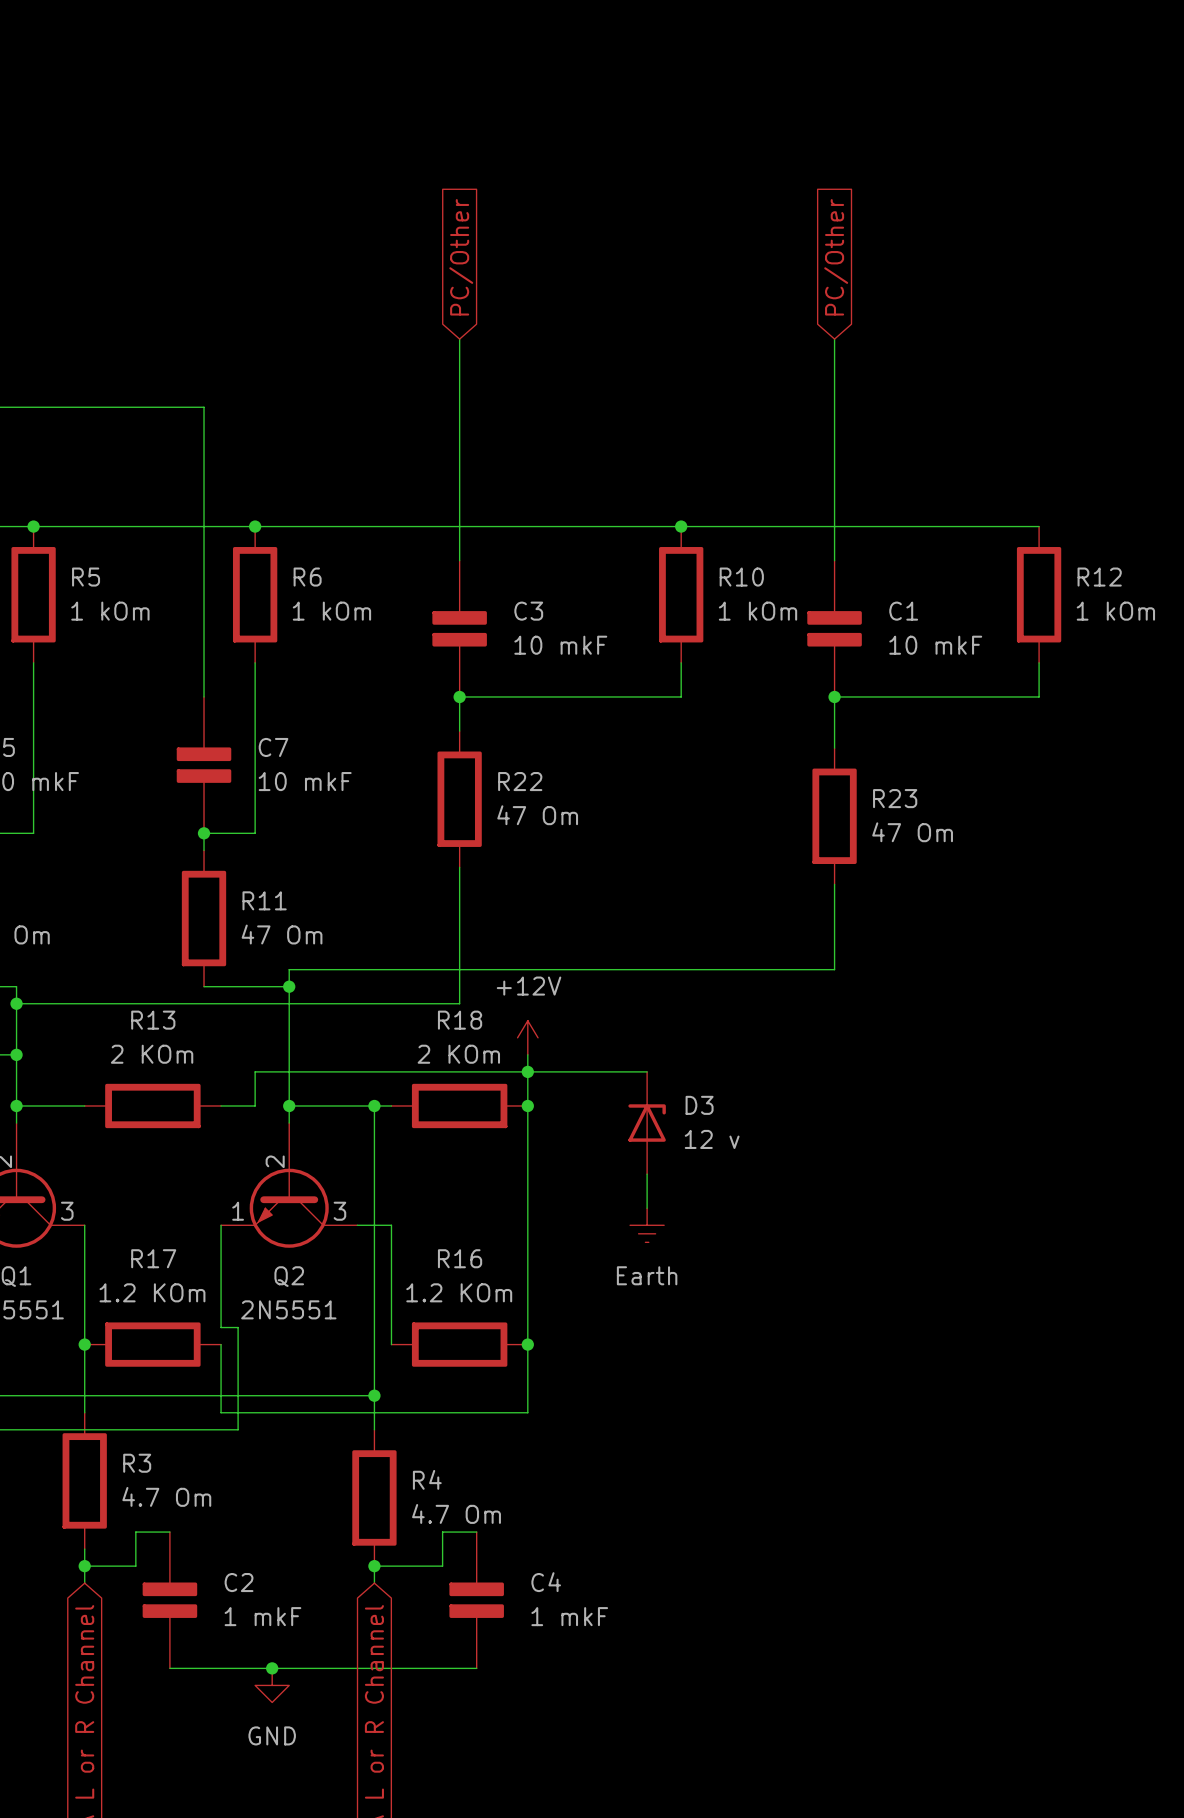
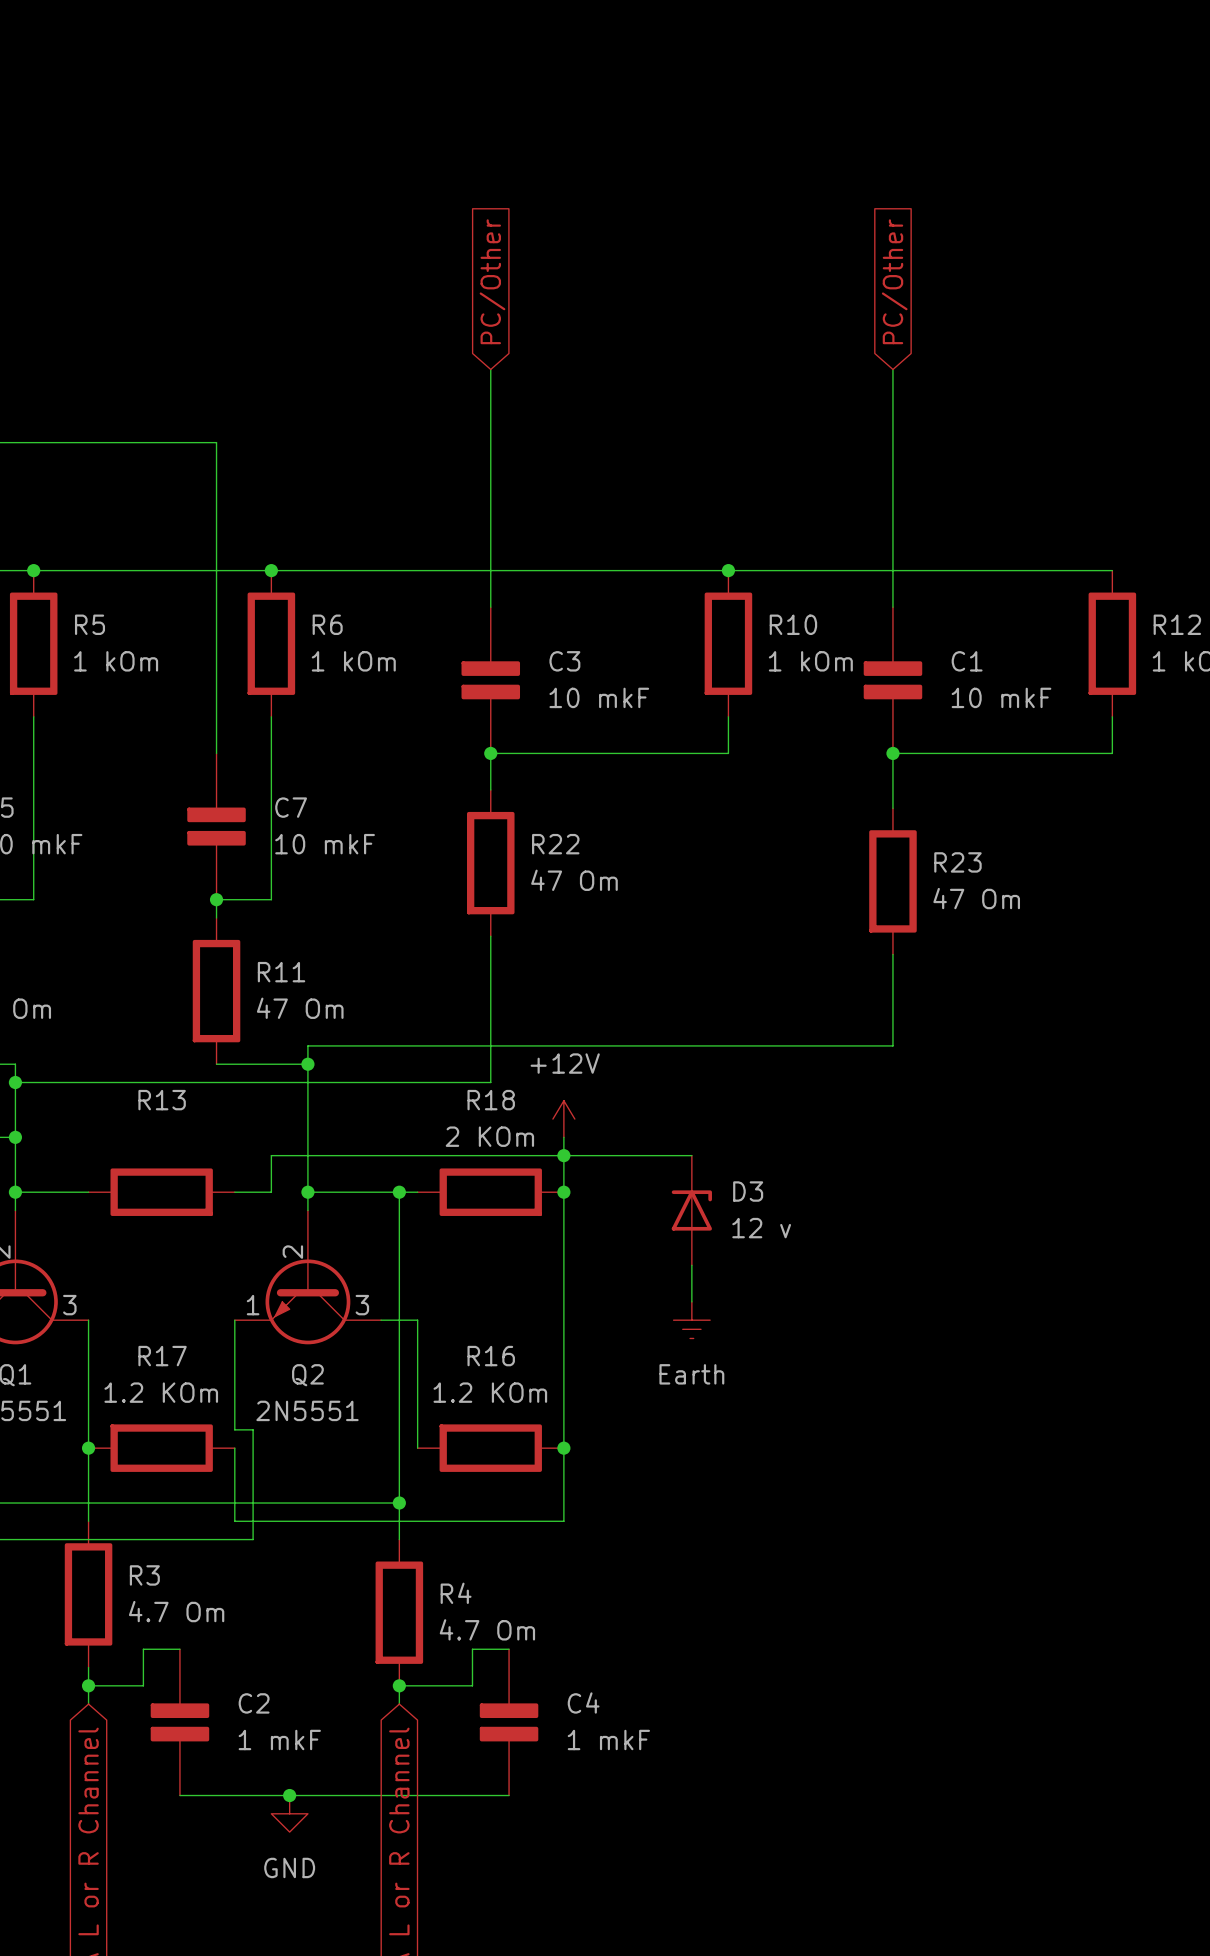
R13 value: 2 KOm (152, 1054) -> none

